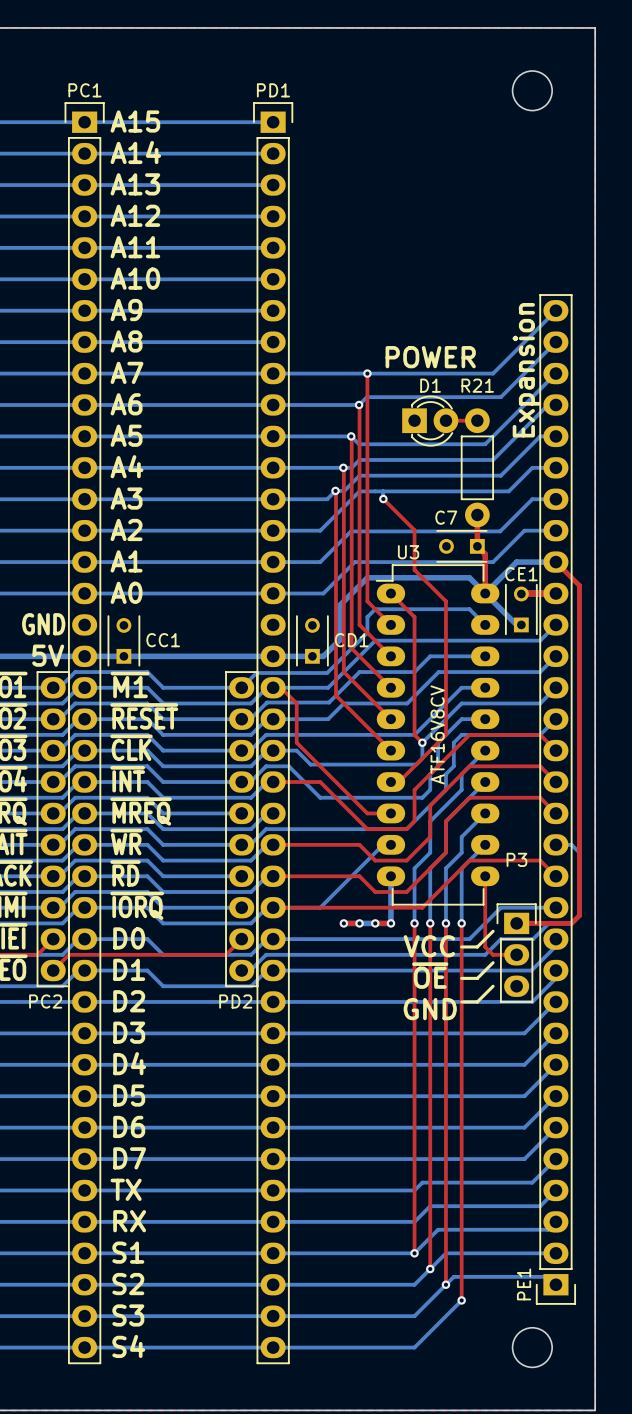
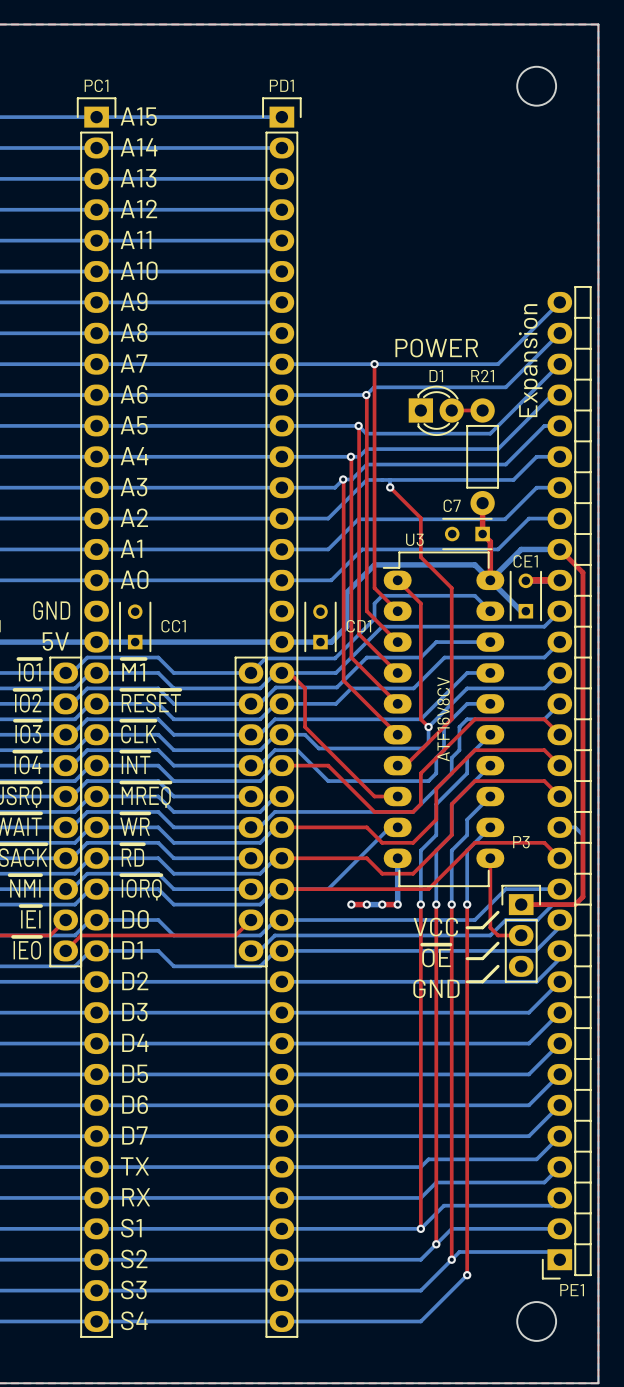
PE1 footprint: [535, 294, 577, 1305] -> [541, 286, 592, 1280]
PC2 name: PC2 (45, 1001) -> none
PD2 name: PD2 (235, 1001) -> none
PE1 name position: PE1 (524, 1284) -> PE1 (572, 1290)

